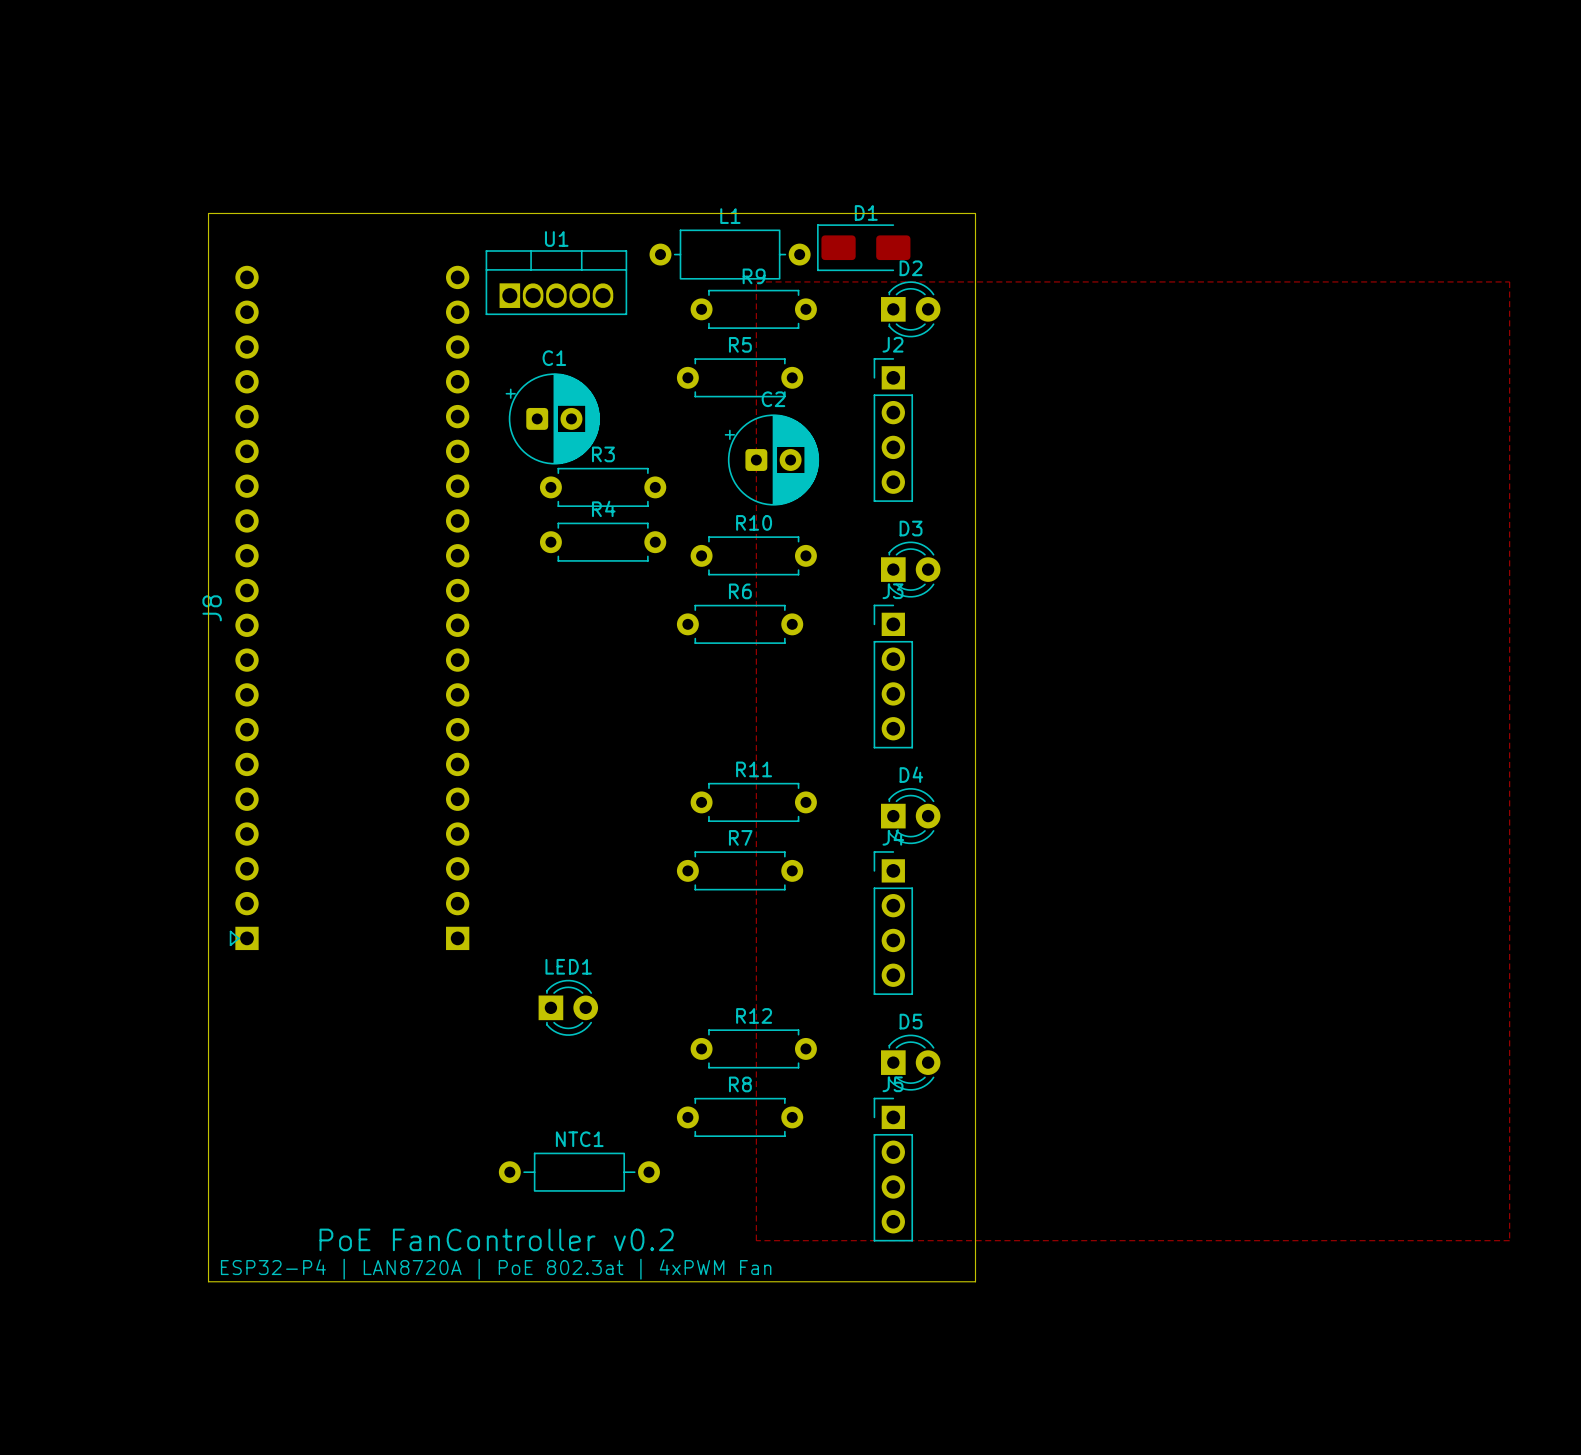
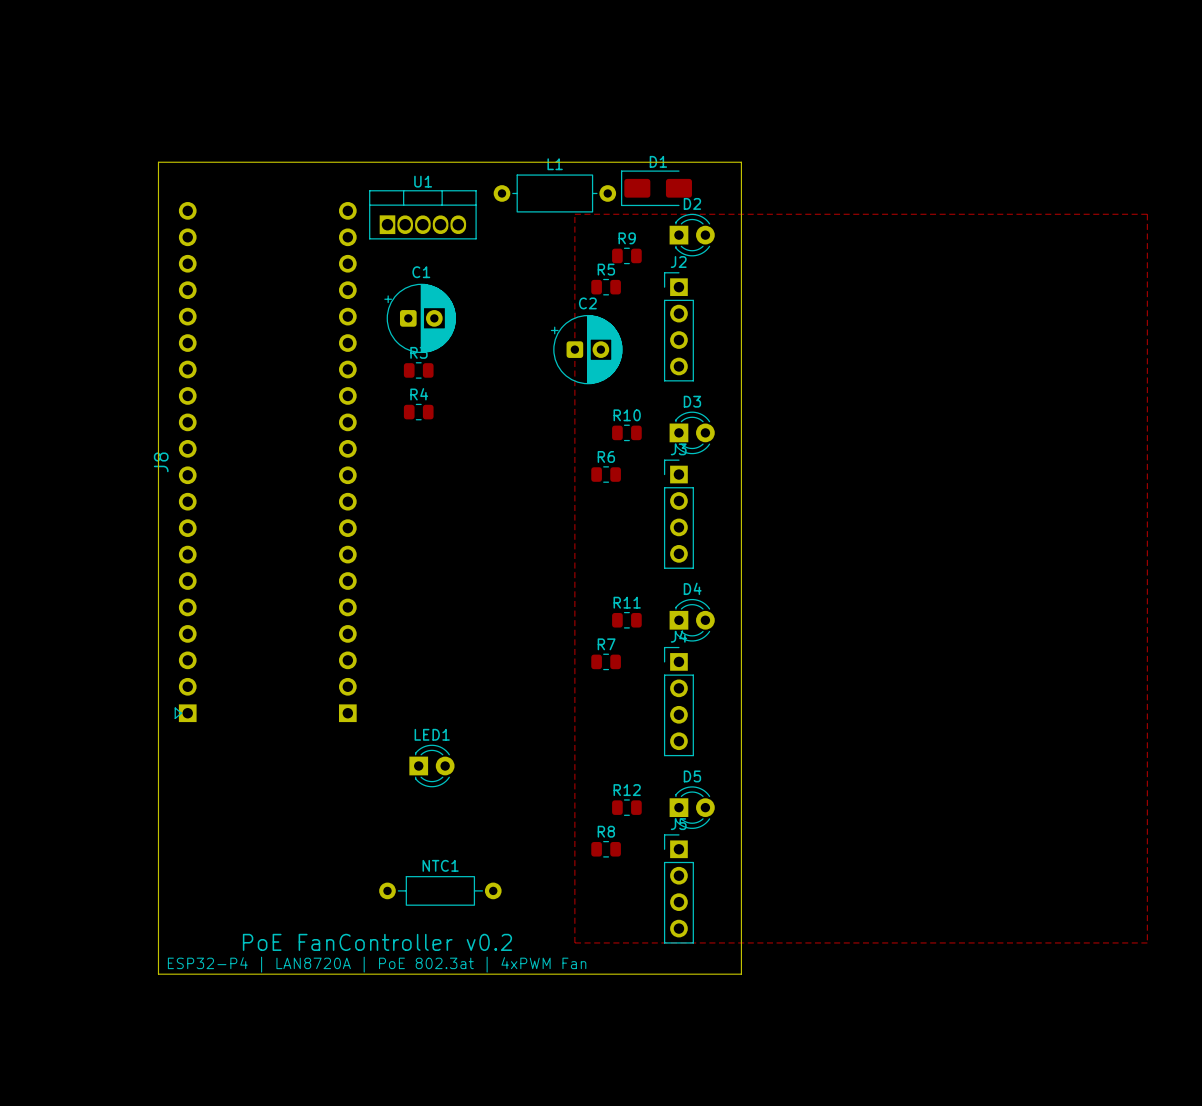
R9 footprint: [690, 289, 817, 329] -> [612, 247, 642, 265]
R5 footprint: [676, 358, 804, 398] -> [591, 278, 621, 296]
R3 footprint: [539, 467, 667, 507] -> [403, 362, 434, 379]
R4 footprint: [539, 522, 667, 562] -> [403, 403, 434, 421]
R10 footprint: [690, 536, 817, 576] -> [612, 424, 642, 442]
R6 footprint: [676, 604, 804, 644] -> [591, 466, 621, 483]
R11 footprint: [690, 782, 817, 822] -> [612, 611, 642, 629]
R7 footprint: [676, 851, 804, 891] -> [591, 653, 621, 671]
R12 footprint: [690, 1029, 817, 1069] -> [612, 799, 642, 816]
R8 footprint: [676, 1097, 804, 1137] -> [591, 841, 621, 858]

